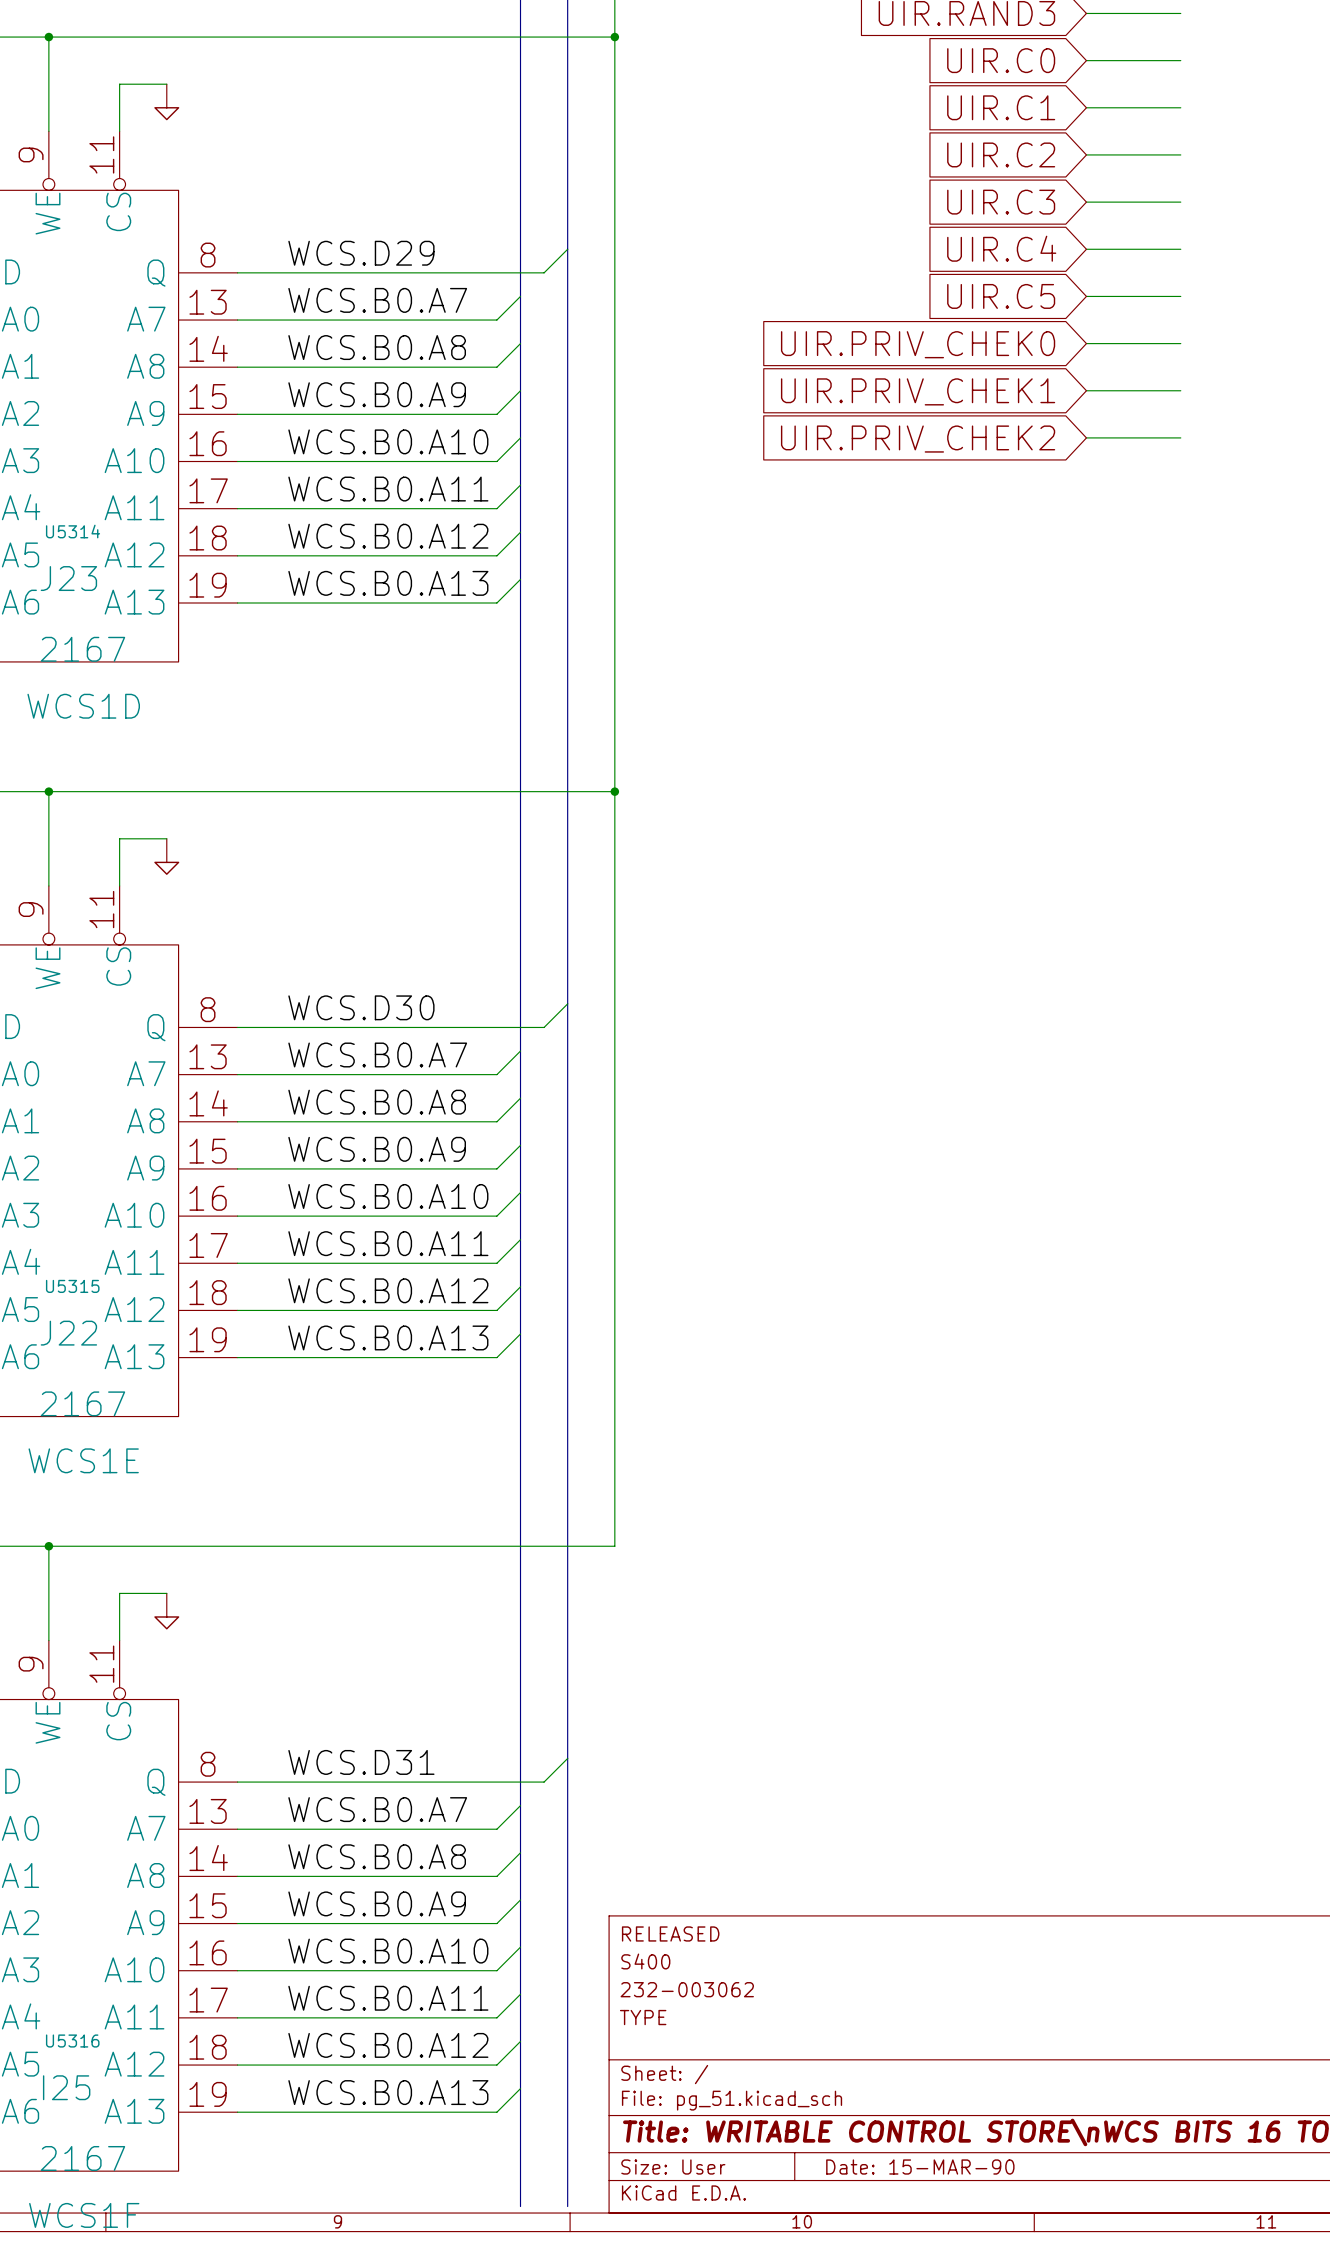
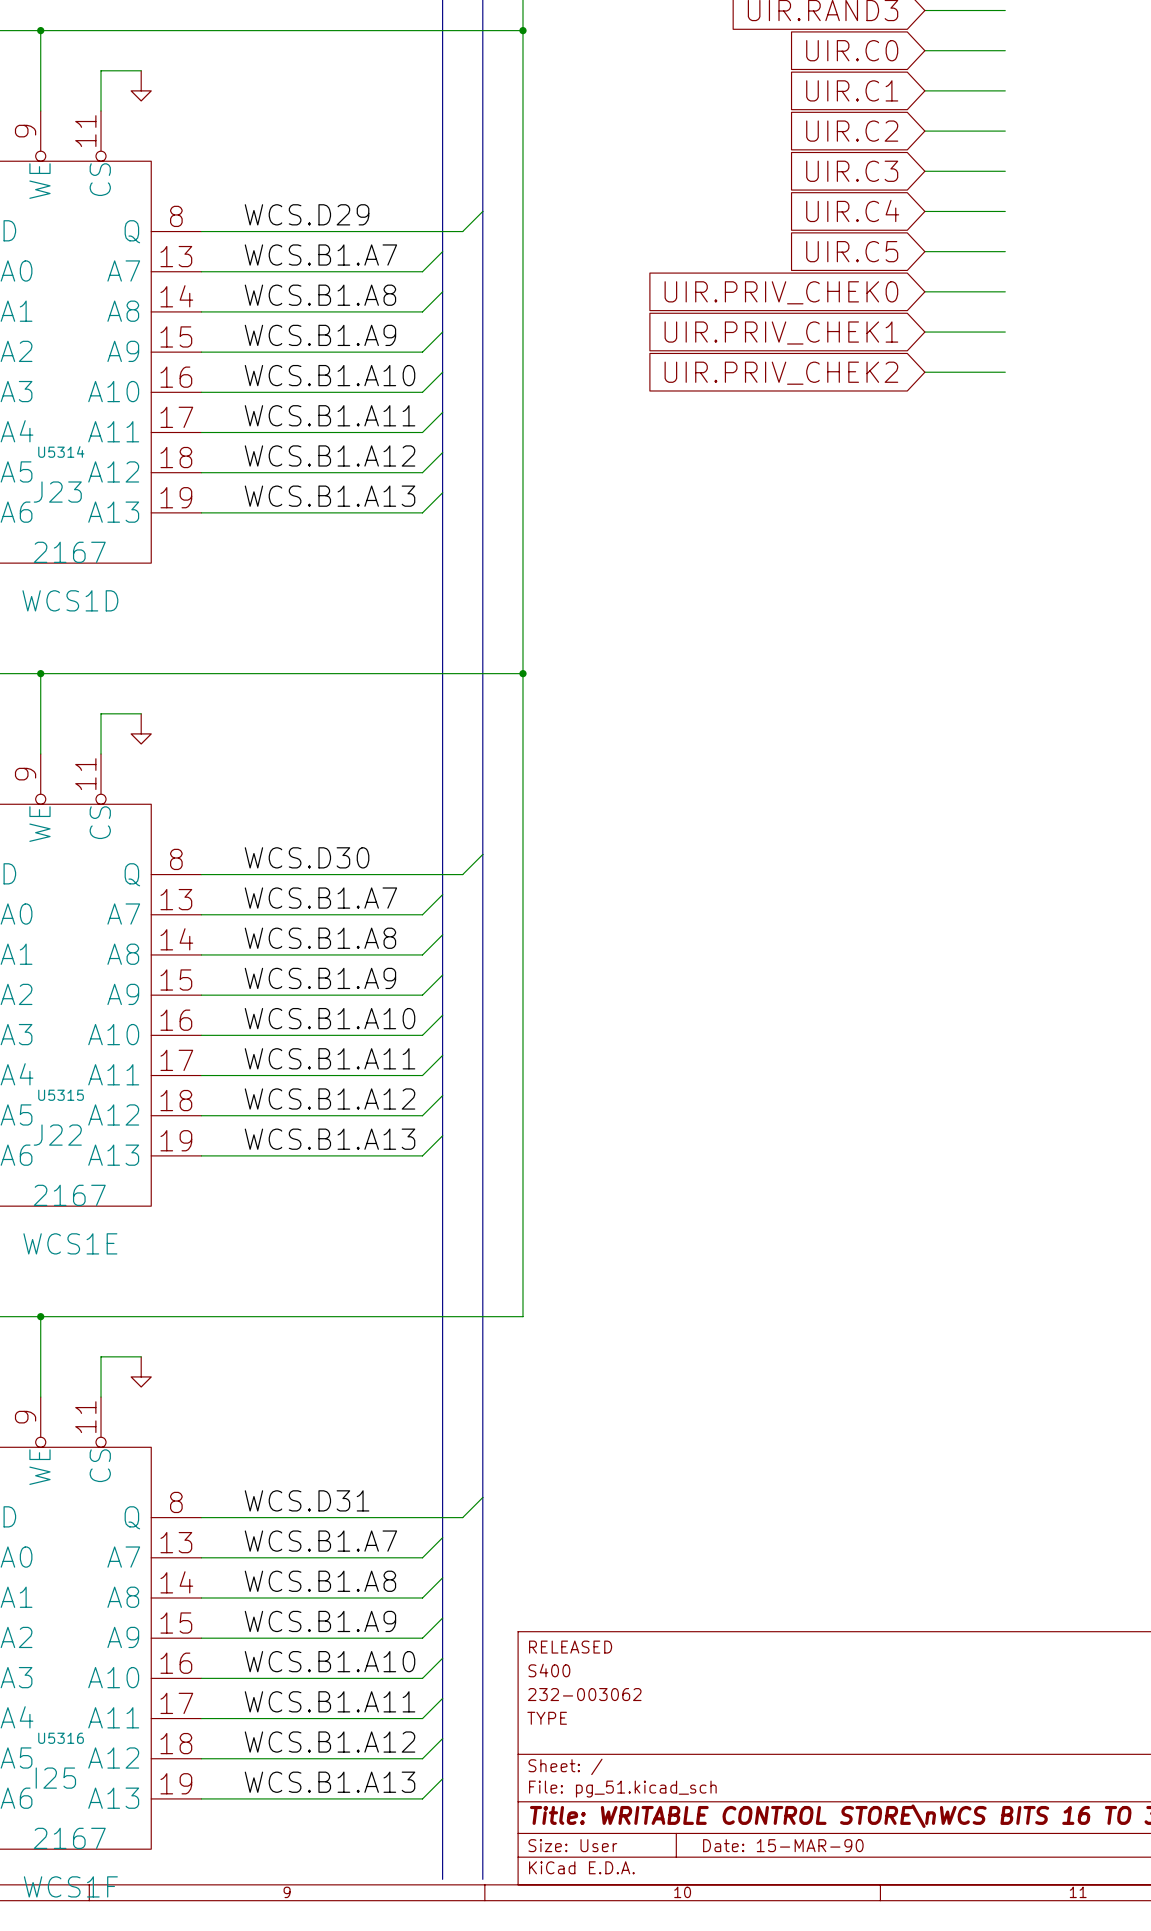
label: WCS.B0.A7 (377, 300) -> WCS.B1.A7 (320, 255)
label: WCS.B0.A8 (377, 347) -> WCS.B1.A8 (320, 295)
label: WCS.B0.A9 (377, 394) -> WCS.B1.A9 (320, 335)
label: WCS.B0.A10 (388, 441) -> WCS.B1.A10 (330, 375)
label: WCS.B0.A11 (388, 489) -> WCS.B1.A11 (330, 415)
label: WCS.B0.A12 (388, 536) -> WCS.B1.A12 (330, 455)
label: WCS.B0.A13 (388, 583) -> WCS.B1.A13 (330, 496)
label: WCS.B0.A7 (377, 1054) -> WCS.B1.A7 (320, 898)
label: WCS.B0.A8 (377, 1102) -> WCS.B1.A8 (320, 938)
label: WCS.B0.A9 (377, 1149) -> WCS.B1.A9 (320, 978)
label: WCS.B0.A10 (388, 1196) -> WCS.B1.A10 (330, 1018)
label: WCS.B0.A11 (388, 1243) -> WCS.B1.A11 (330, 1058)
label: WCS.B0.A12 (388, 1290) -> WCS.B1.A12 (330, 1098)
label: WCS.B0.A13 (388, 1337) -> WCS.B1.A13 (330, 1139)
label: WCS.B0.A7 (377, 1809) -> WCS.B1.A7 (320, 1541)
label: WCS.B0.A8 (377, 1856) -> WCS.B1.A8 (320, 1581)
label: WCS.B0.A9 (377, 1903) -> WCS.B1.A9 (320, 1621)
label: WCS.B0.A10 (388, 1951) -> WCS.B1.A10 (330, 1661)
label: WCS.B0.A11 (388, 1998) -> WCS.B1.A11 (330, 1701)
label: WCS.B0.A12 (388, 2045) -> WCS.B1.A12 (330, 1742)
label: WCS.B0.A13 (388, 2092) -> WCS.B1.A13 (330, 1782)

